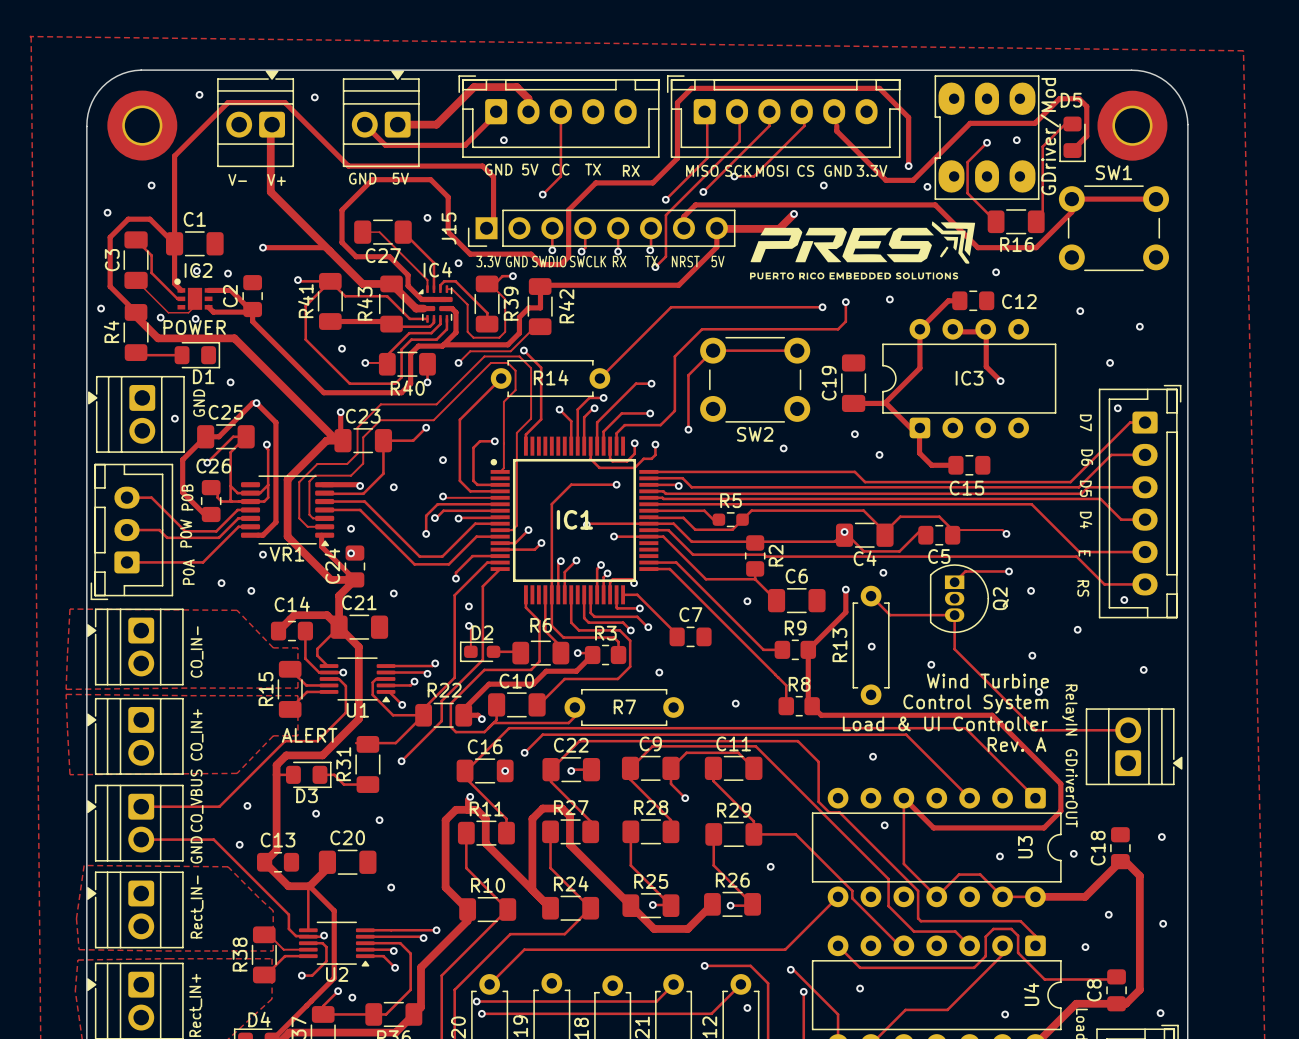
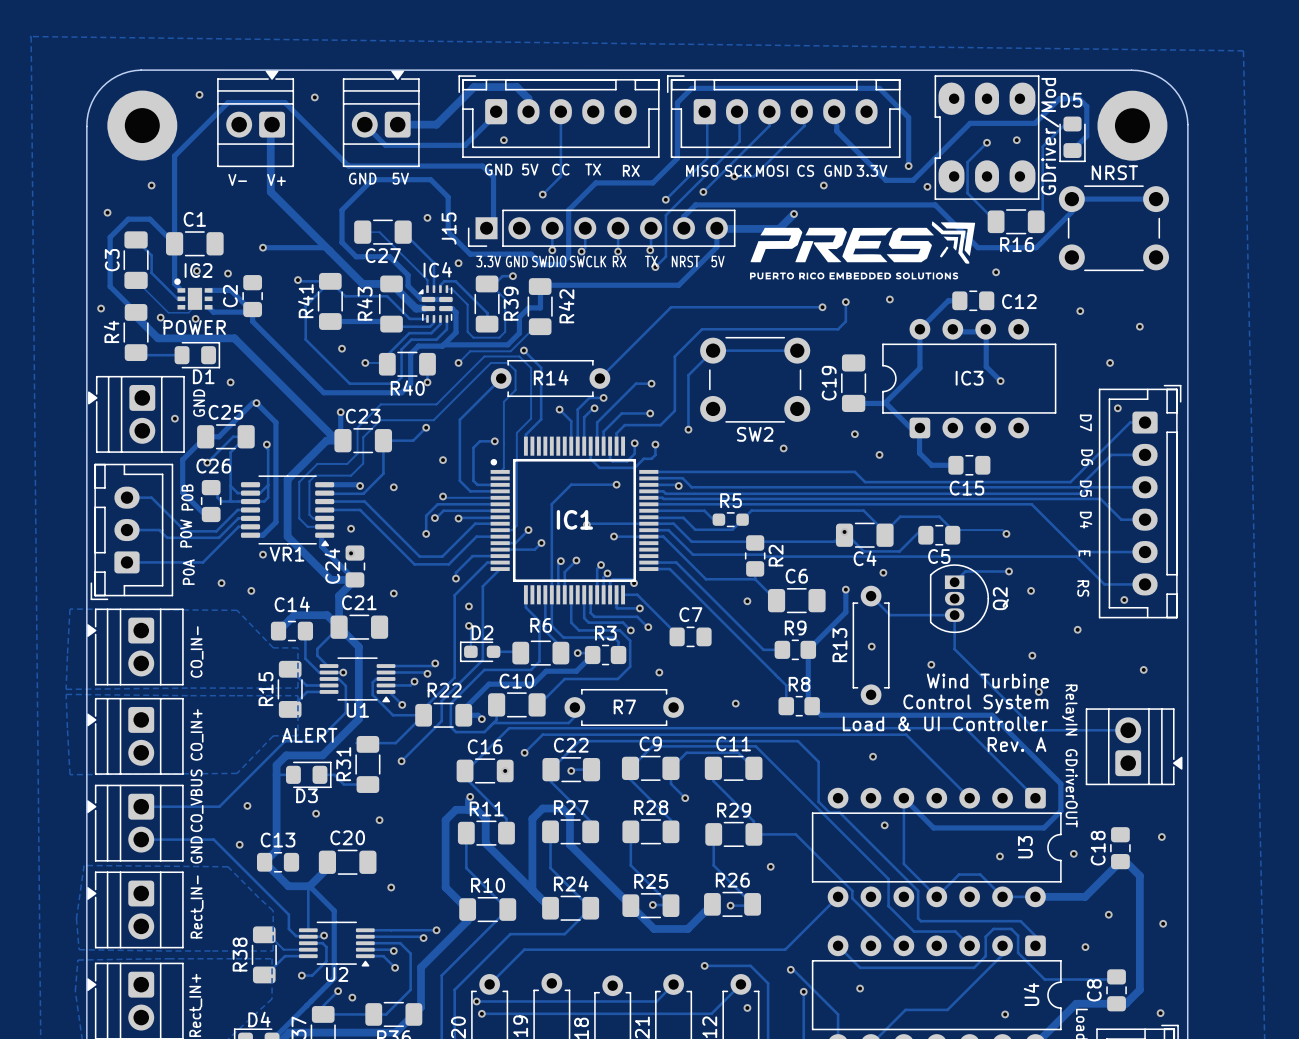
SW1 name: SW1 (1113, 172) -> NRST (1114, 172)

